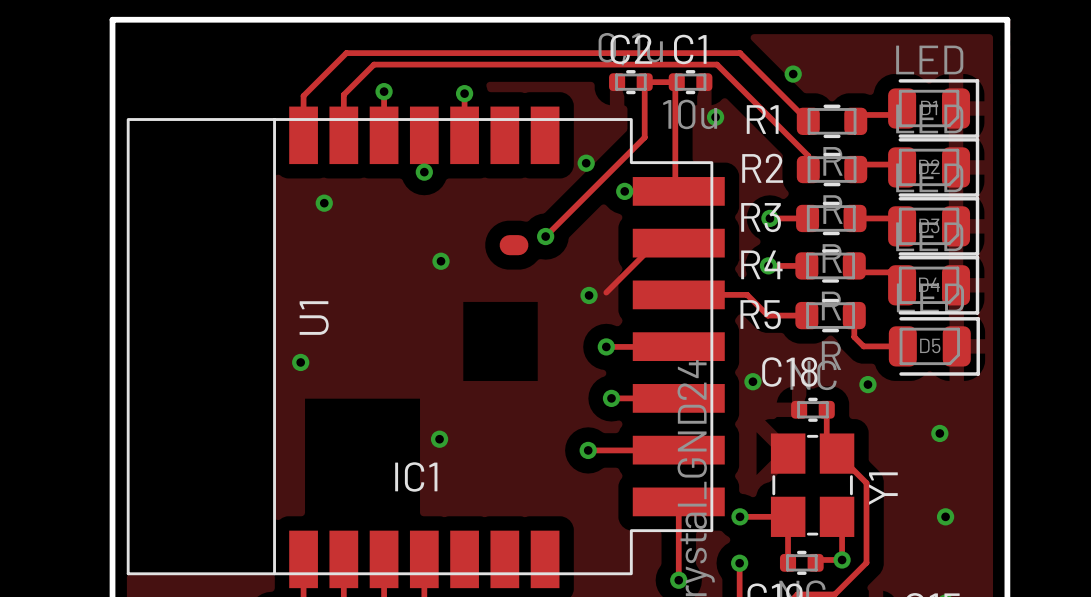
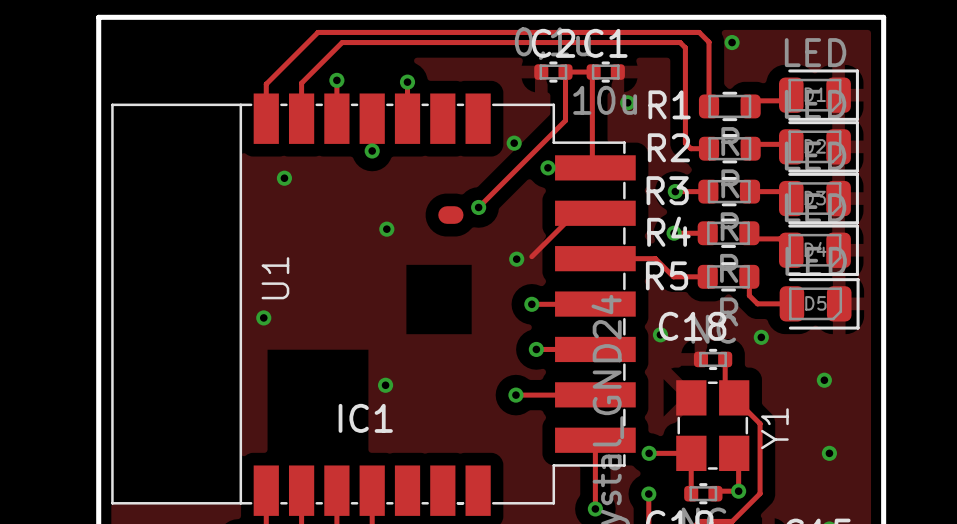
track: (346, 53) (740, 53) (808, 121) -> (303, 46) (317, 32) (699, 32) (709, 42) (709, 106)
track: (374, 64) (717, 64) (808, 155) (808, 169) -> (328, 56) (342, 42) (680, 42) (685, 47) (685, 143) (690, 148) (709, 148)
via position: (793, 74) -> (732, 42)
U1 footprint: [126, 106, 725, 589] -> [111, 93, 636, 516]

